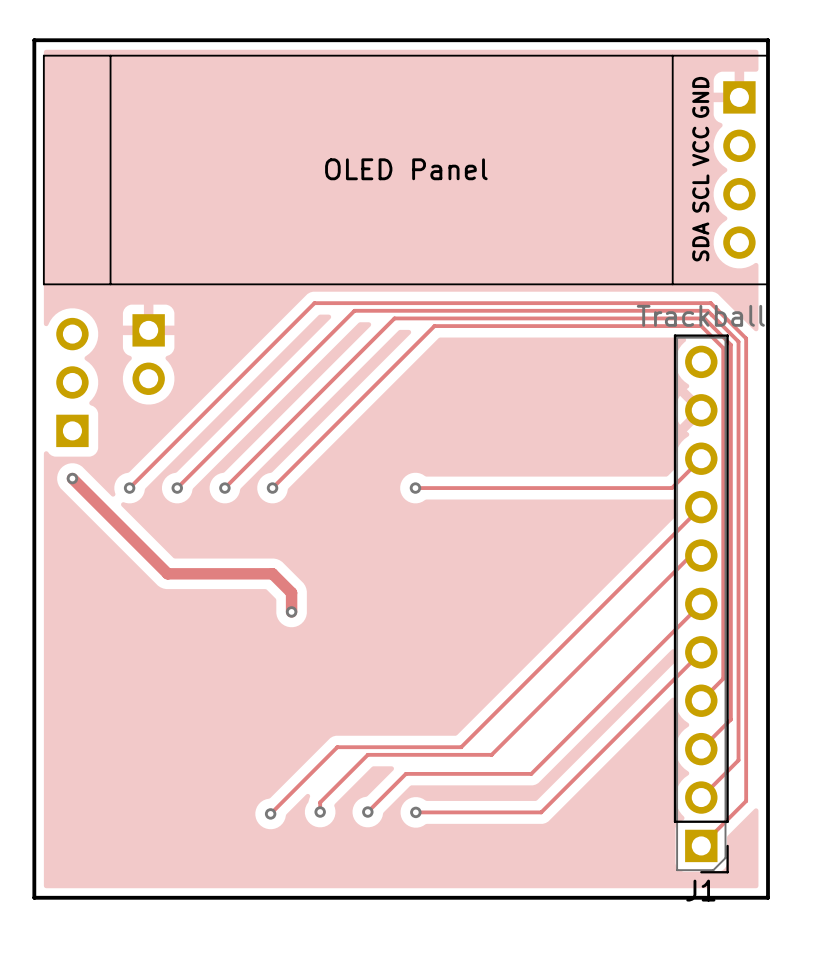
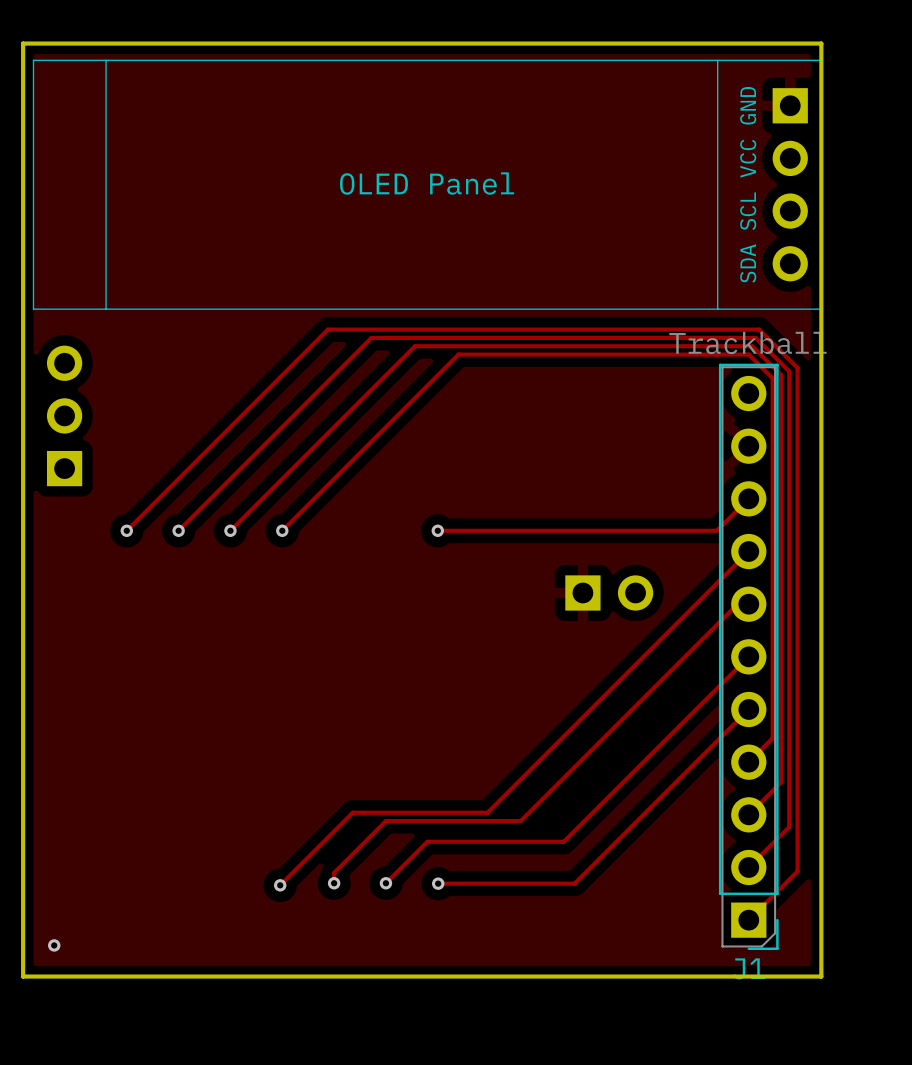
part rotation: 0° (148, 354) -> 90° counterclockwise (609, 592)
part position: (148, 354) -> (609, 592)
track: (72, 478) (167, 573) (272, 573) (291, 592) (291, 611) -> none
via: (72, 478) -> none
via: (291, 611) -> none
via: none -> (54, 945)

